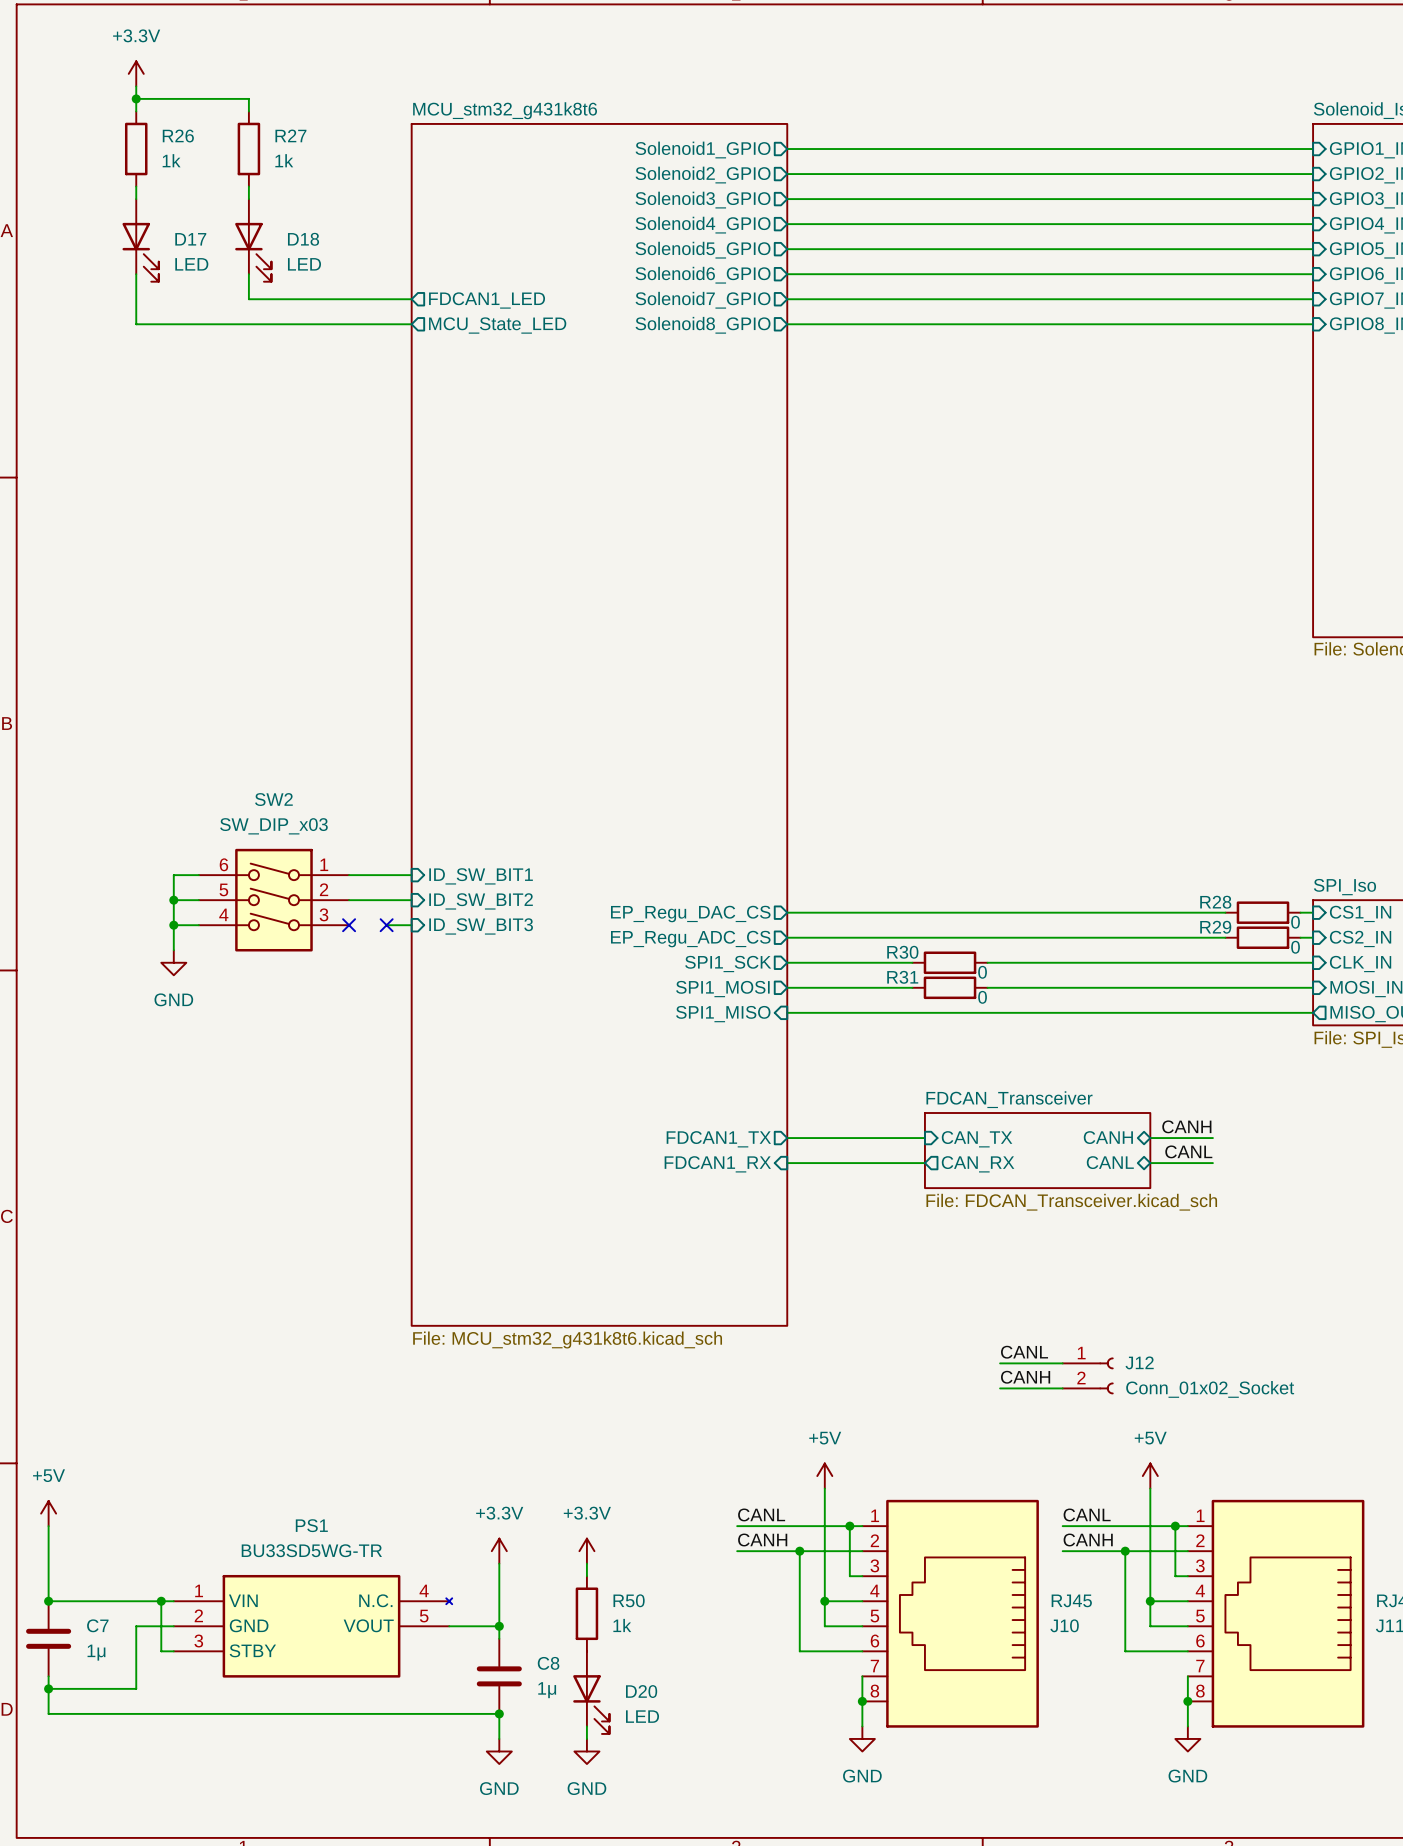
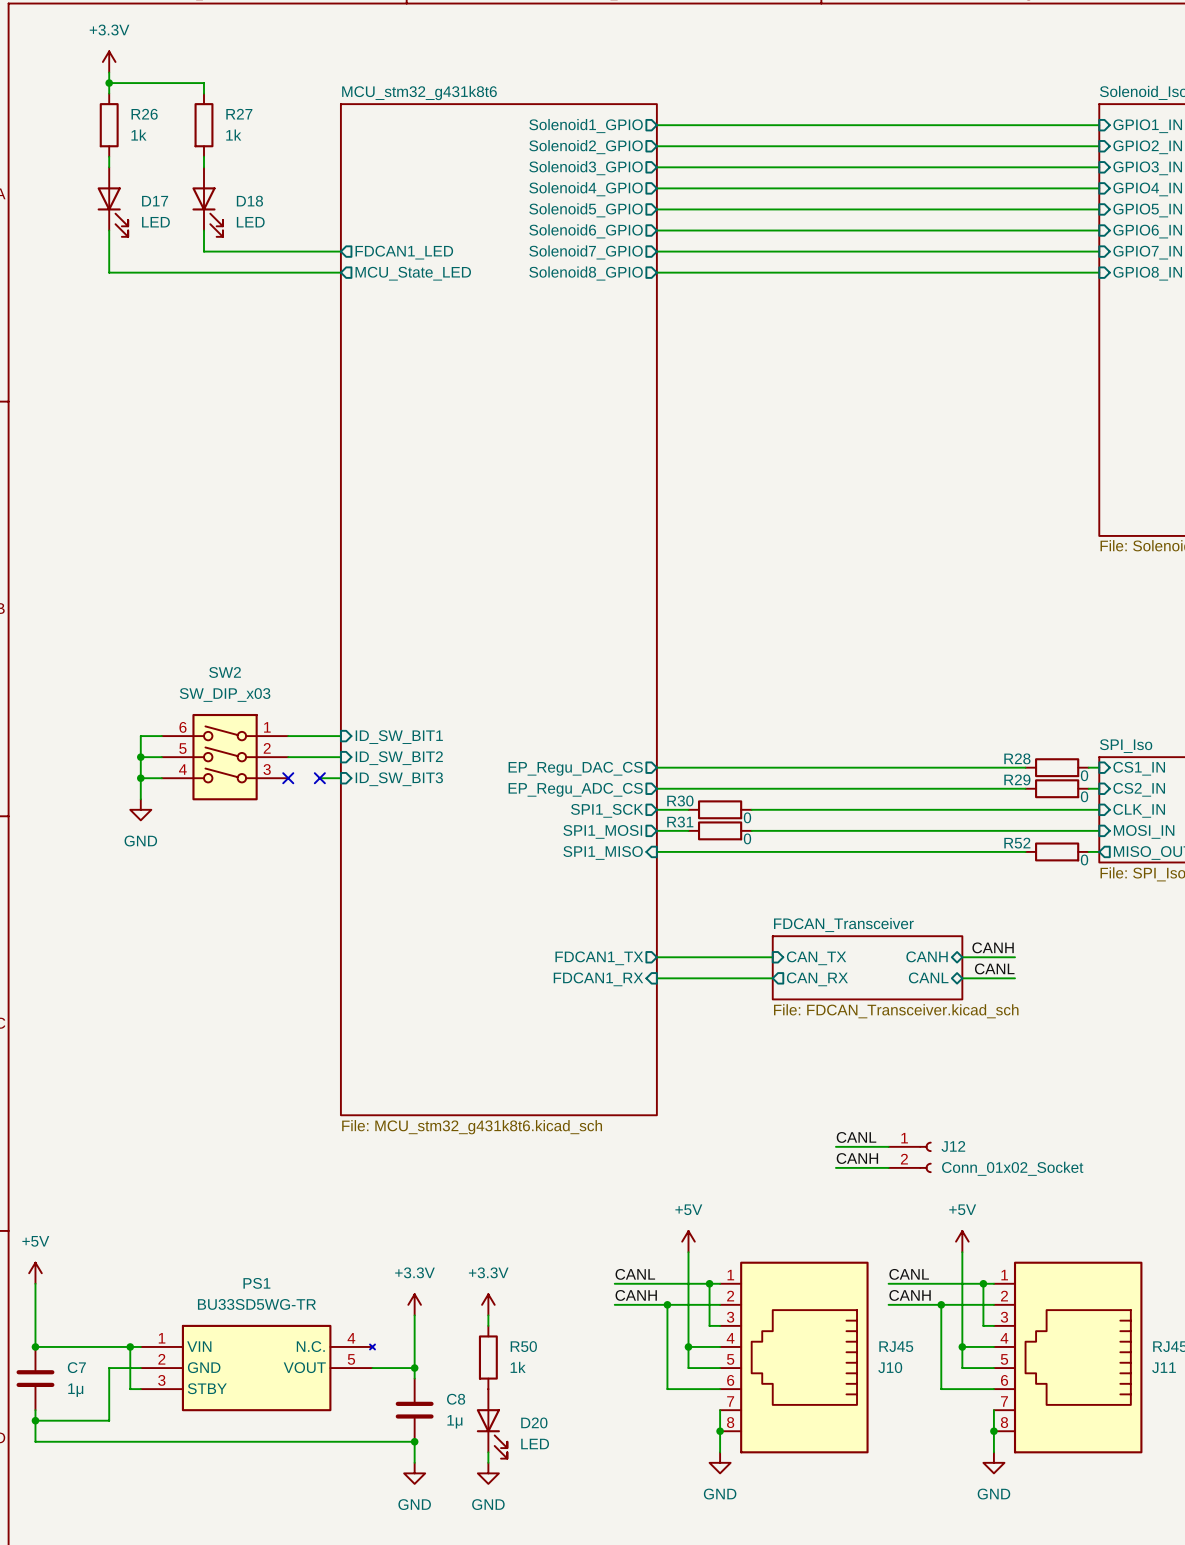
wire: (824, 962) (899, 962) -> (762, 809) (825, 809)
R30 position: (950, 962) -> (720, 809)
wire: (824, 987) (899, 987) -> (762, 830) (825, 830)
R31 position: (950, 987) -> (720, 830)
wire: (1225, 1012) (1300, 1012) -> none
R52: none -> 0 (1057, 851)

